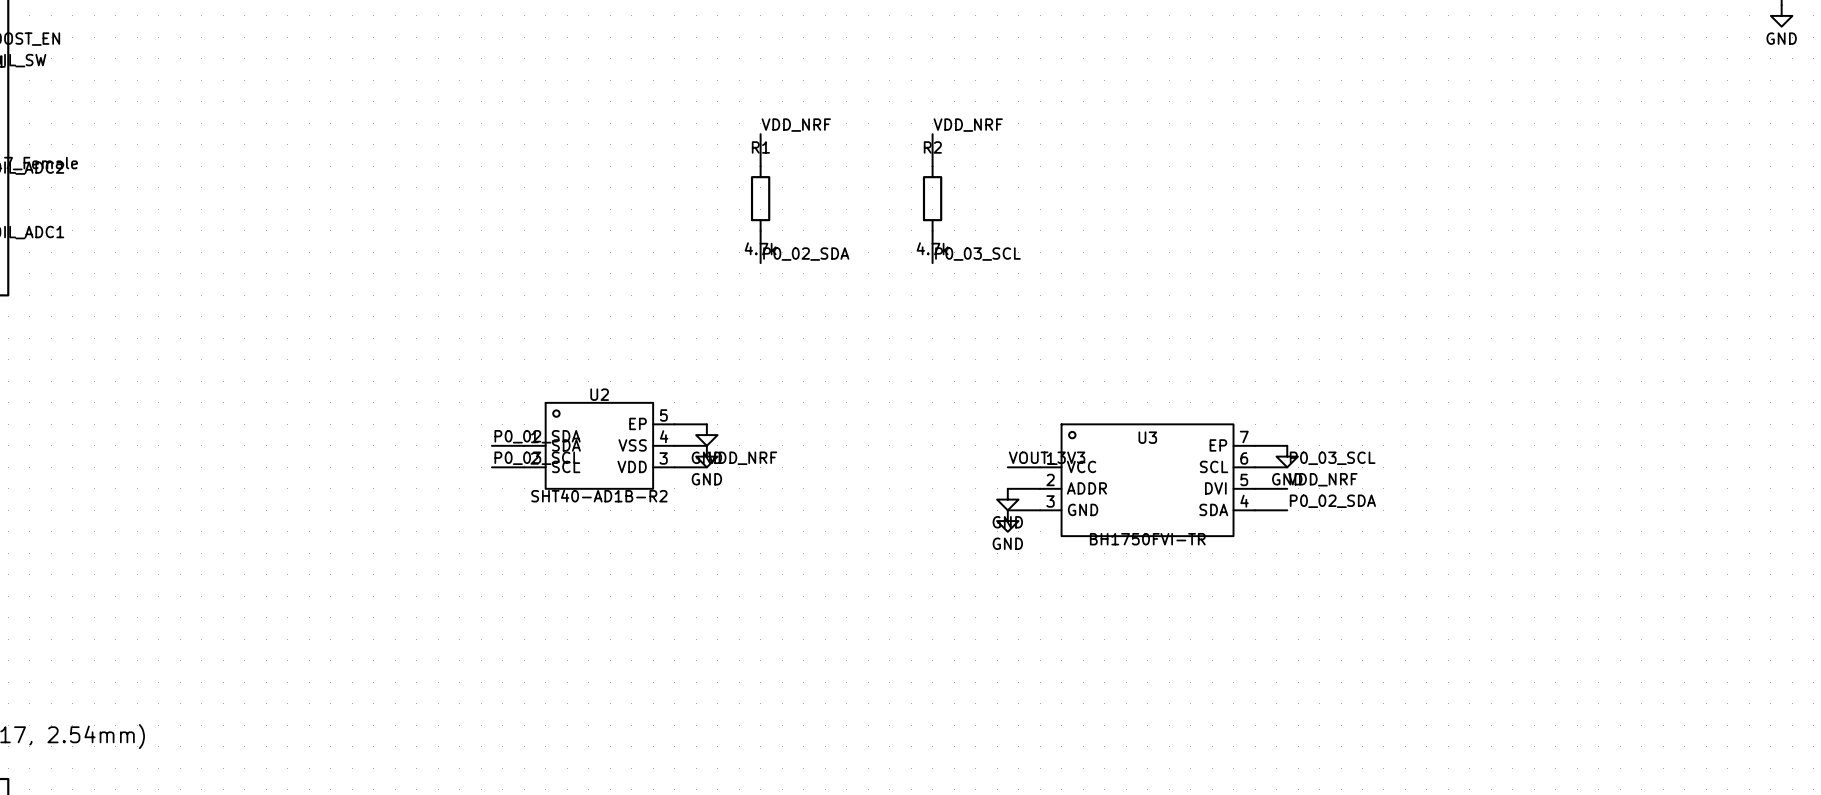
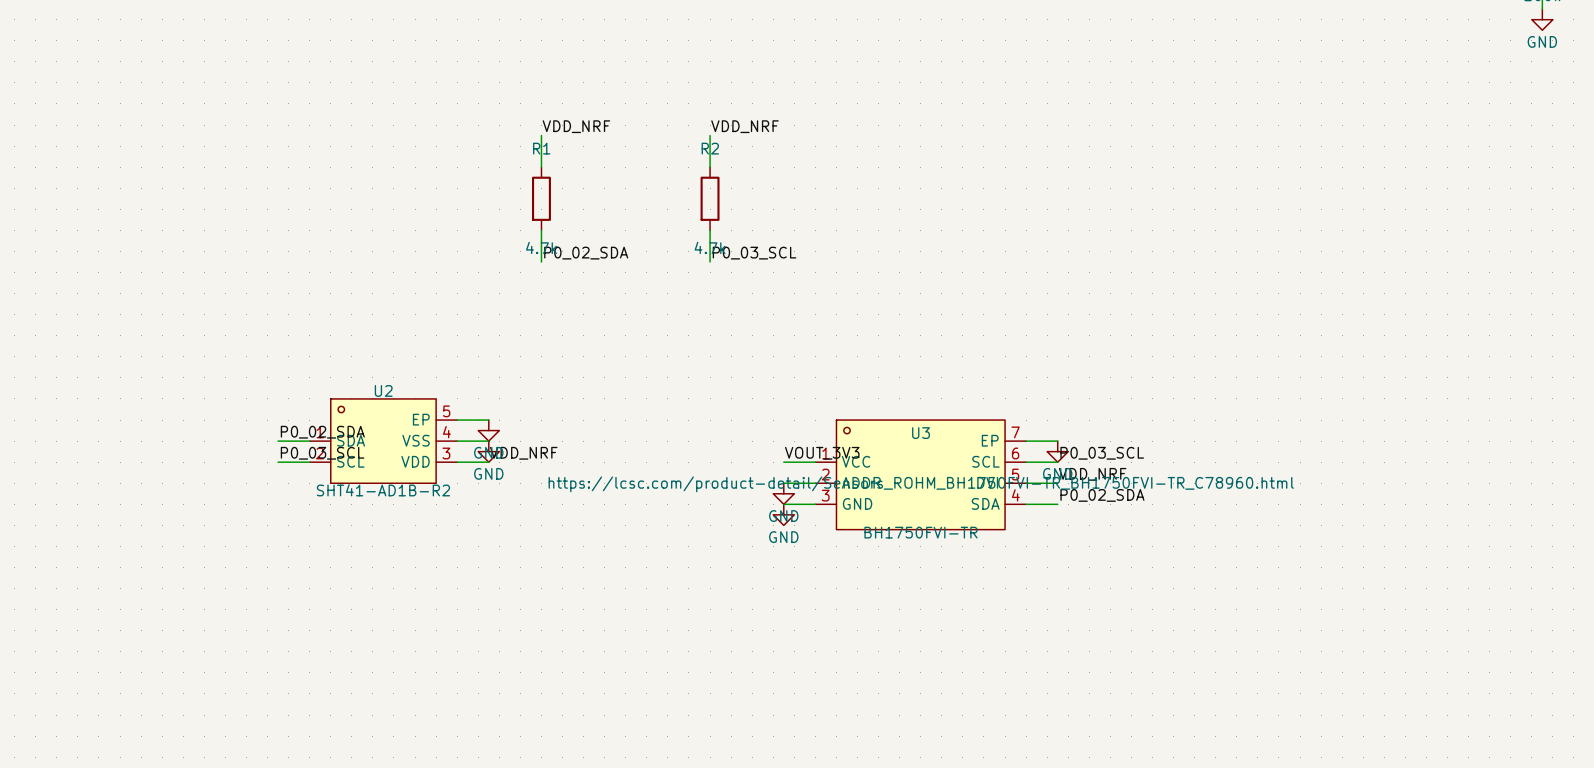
U3 text: none -> https://lcsc.com/product-detail/Sensors_ROHM_BH1750FVI-TR_BH1750FVI-TR_C78960.html (921, 484)
U2 value: SHT40-AD1B-R2 (599, 495) -> SHT41-AD1B-R2 (383, 490)

